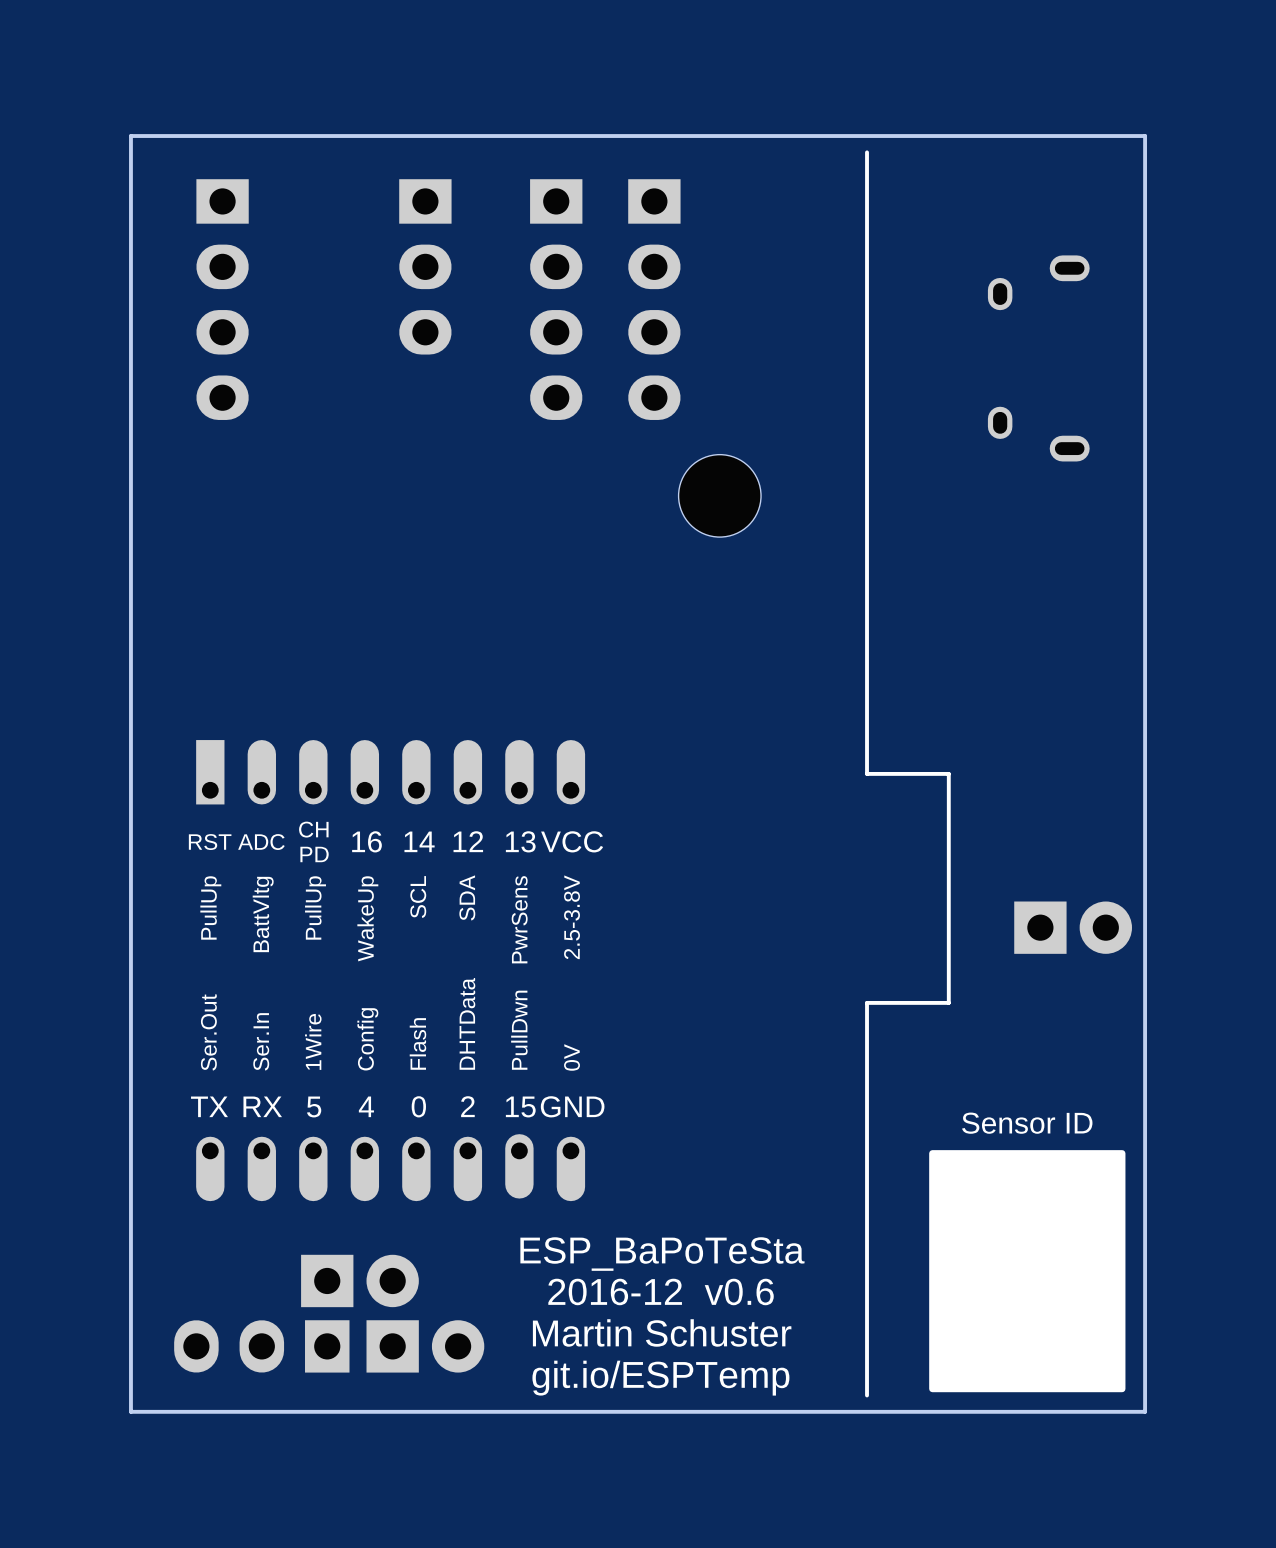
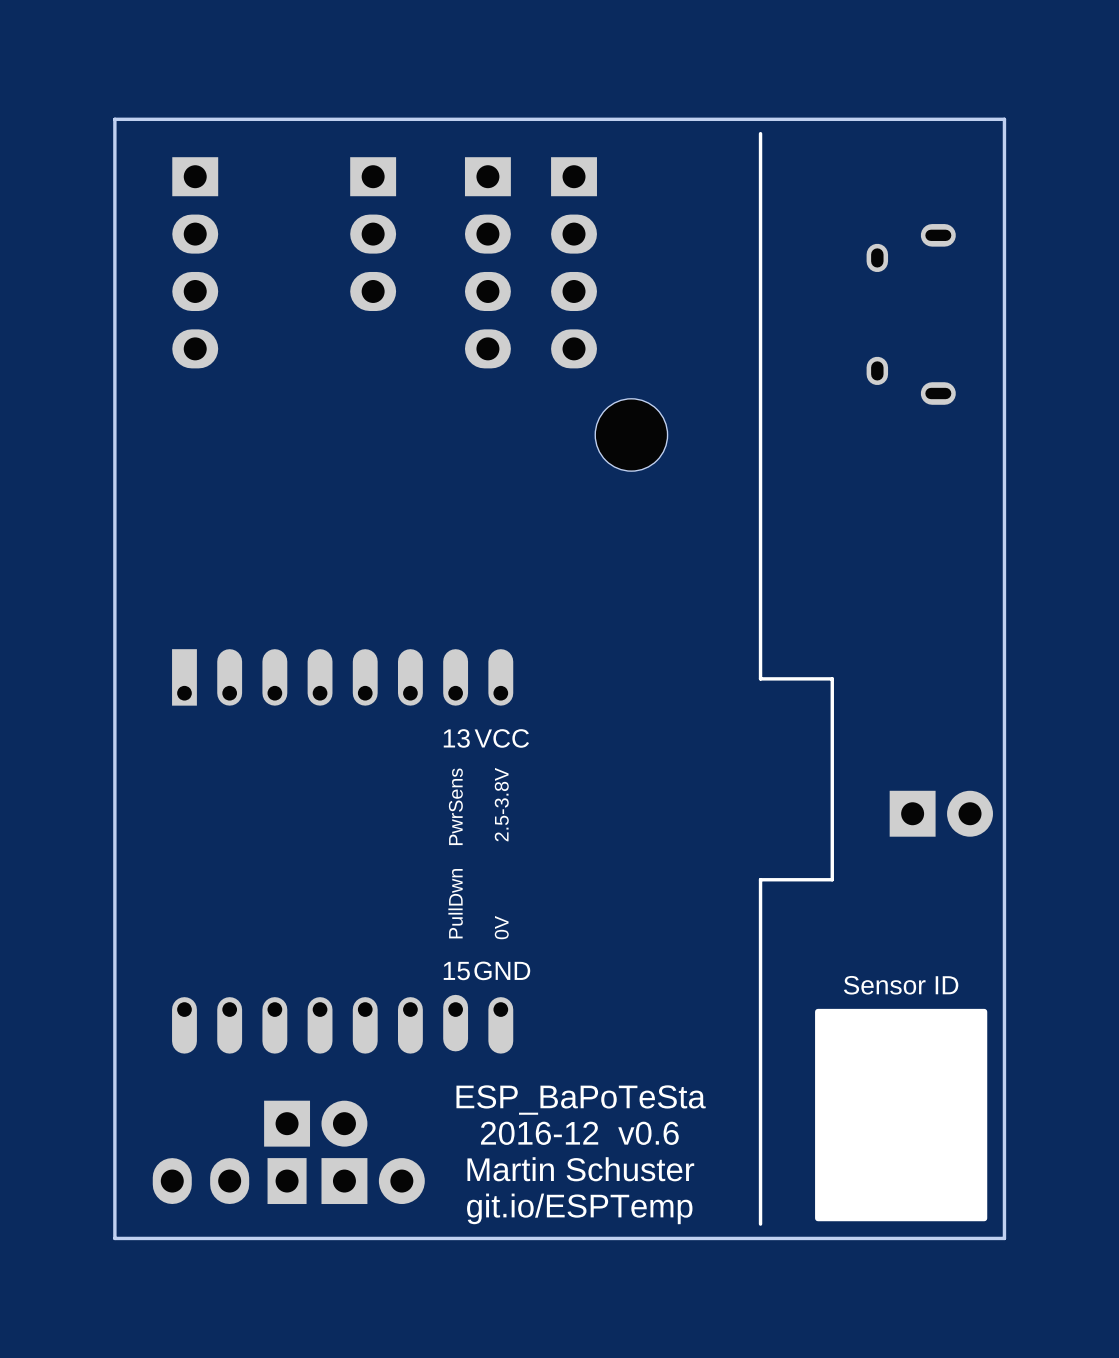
text: CH (313, 829) -> none
text: 16 (366, 841) -> none
text: 14 (419, 841) -> none
text: 12 (468, 841) -> none
text: RST (210, 842) -> none
text: ADC (261, 842) -> none
text: PD (314, 854) -> none
text: SCL (418, 897) -> none
text: SDA (467, 897) -> none
text: PullUp (210, 907) -> none
text: PullUp (315, 907) -> none
text: BattVltg (263, 914) -> none
text: WakeUp (367, 918) -> none
text: DHTData (467, 1023) -> none
text: Ser.Out (208, 1032) -> none
text: Config (367, 1039) -> none
text: Ser.In (261, 1041) -> none
text: 1Wire (313, 1041) -> none
text: Flash (417, 1043) -> none
text: TX (209, 1106) -> none
text: RX (262, 1106) -> none
text: 5 (314, 1106) -> none
text: 4 (366, 1106) -> none
text: 0 (418, 1106) -> none
text: 2 (467, 1106) -> none

